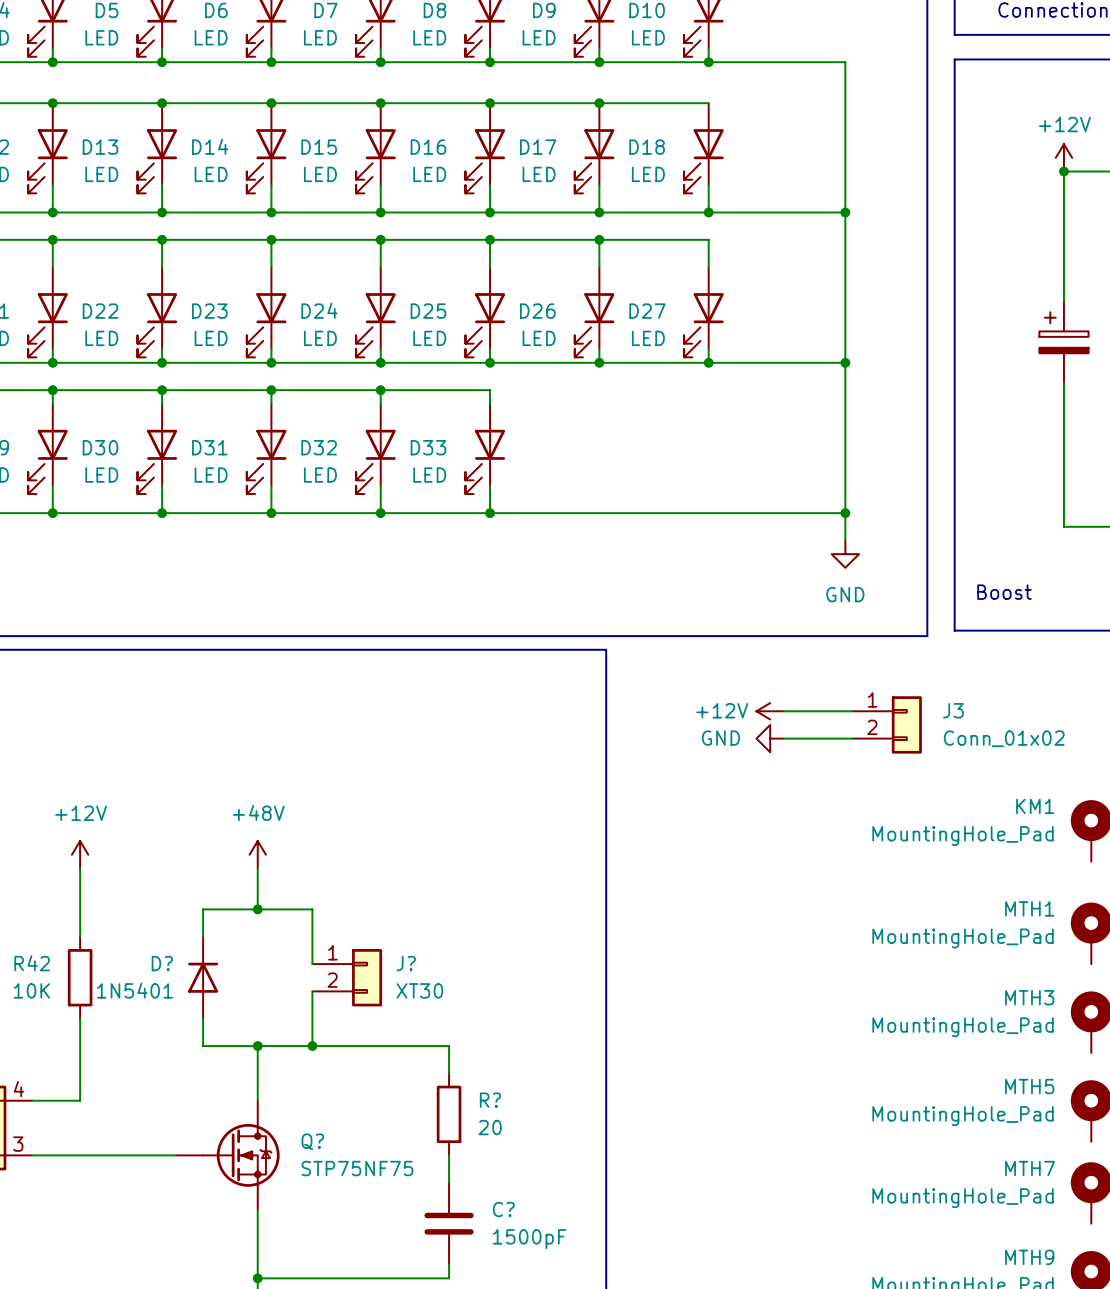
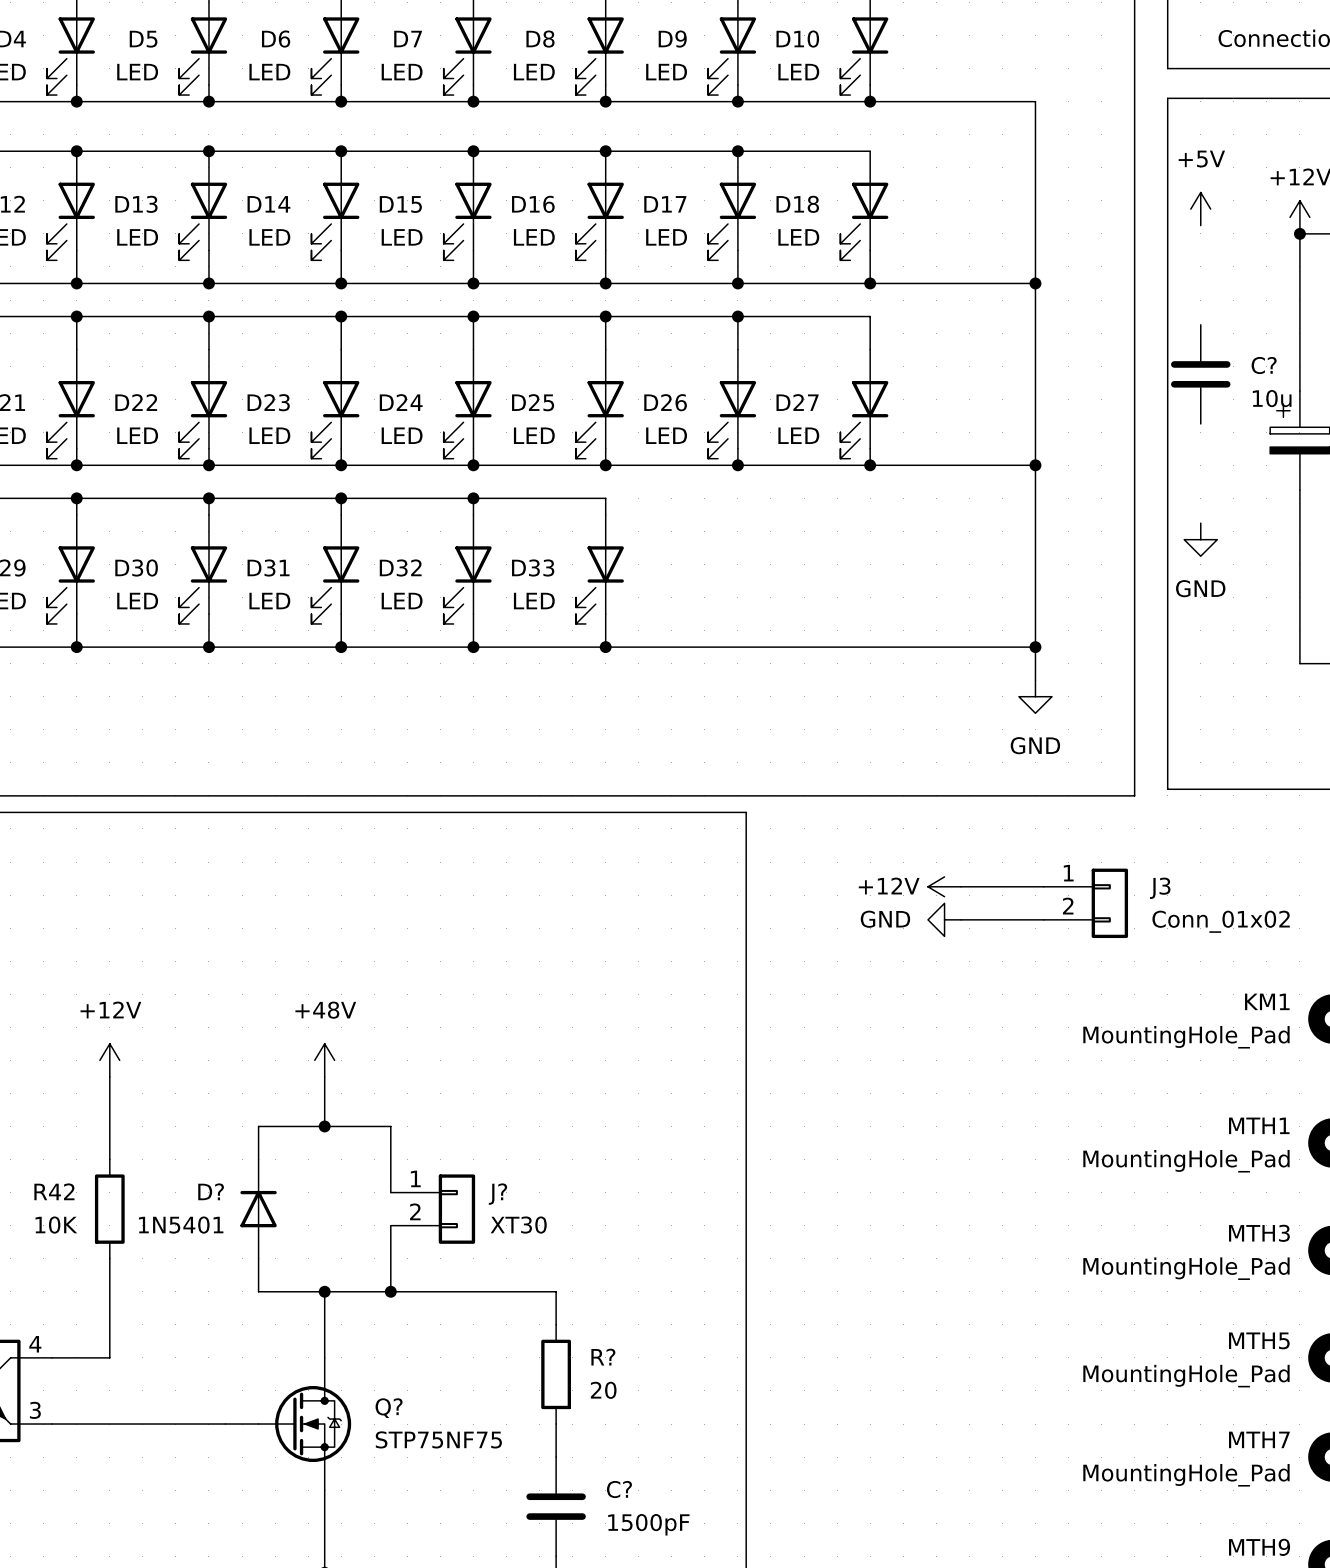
power symbol: none -> +5V (1200, 209)
C?: none -> 10u (1200, 374)
power symbol: none -> GND (1200, 539)
text: Boost (1004, 592) -> none

